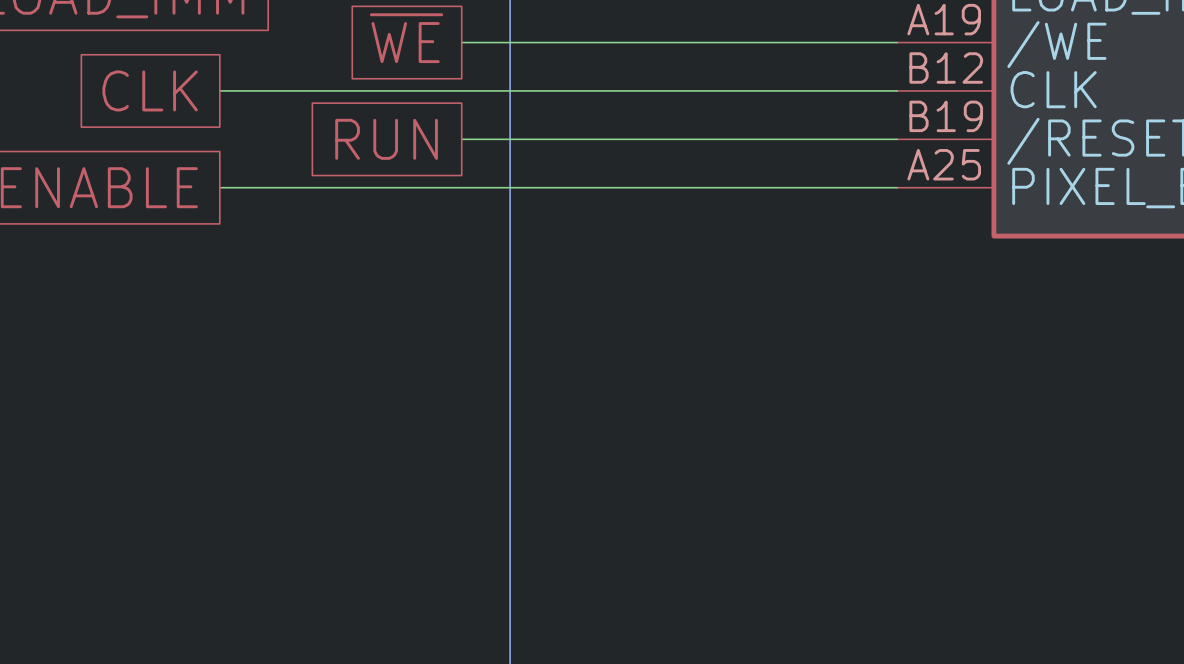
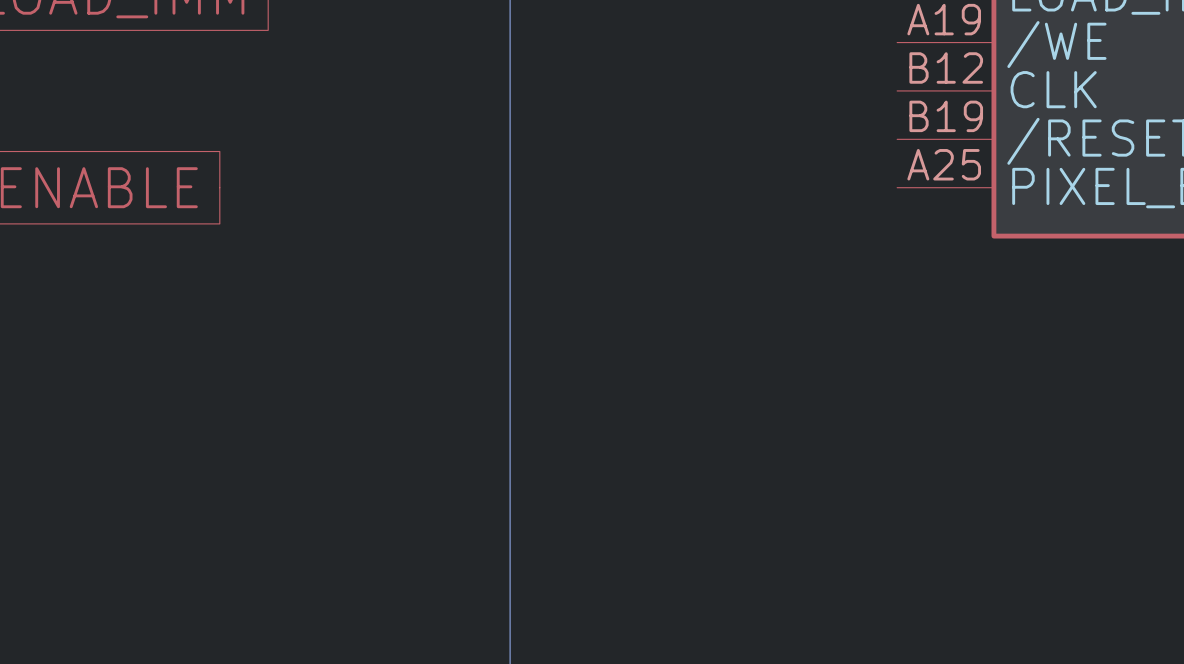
global label: ~{WE} (406, 38) -> none
wire: (461, 42) (897, 42) -> none
global label: CLK (150, 90) -> none
wire: (219, 90) (897, 90) -> none
global label: RUN (386, 139) -> none
wire: (461, 139) (897, 139) -> none
wire: (219, 187) (897, 187) -> none

